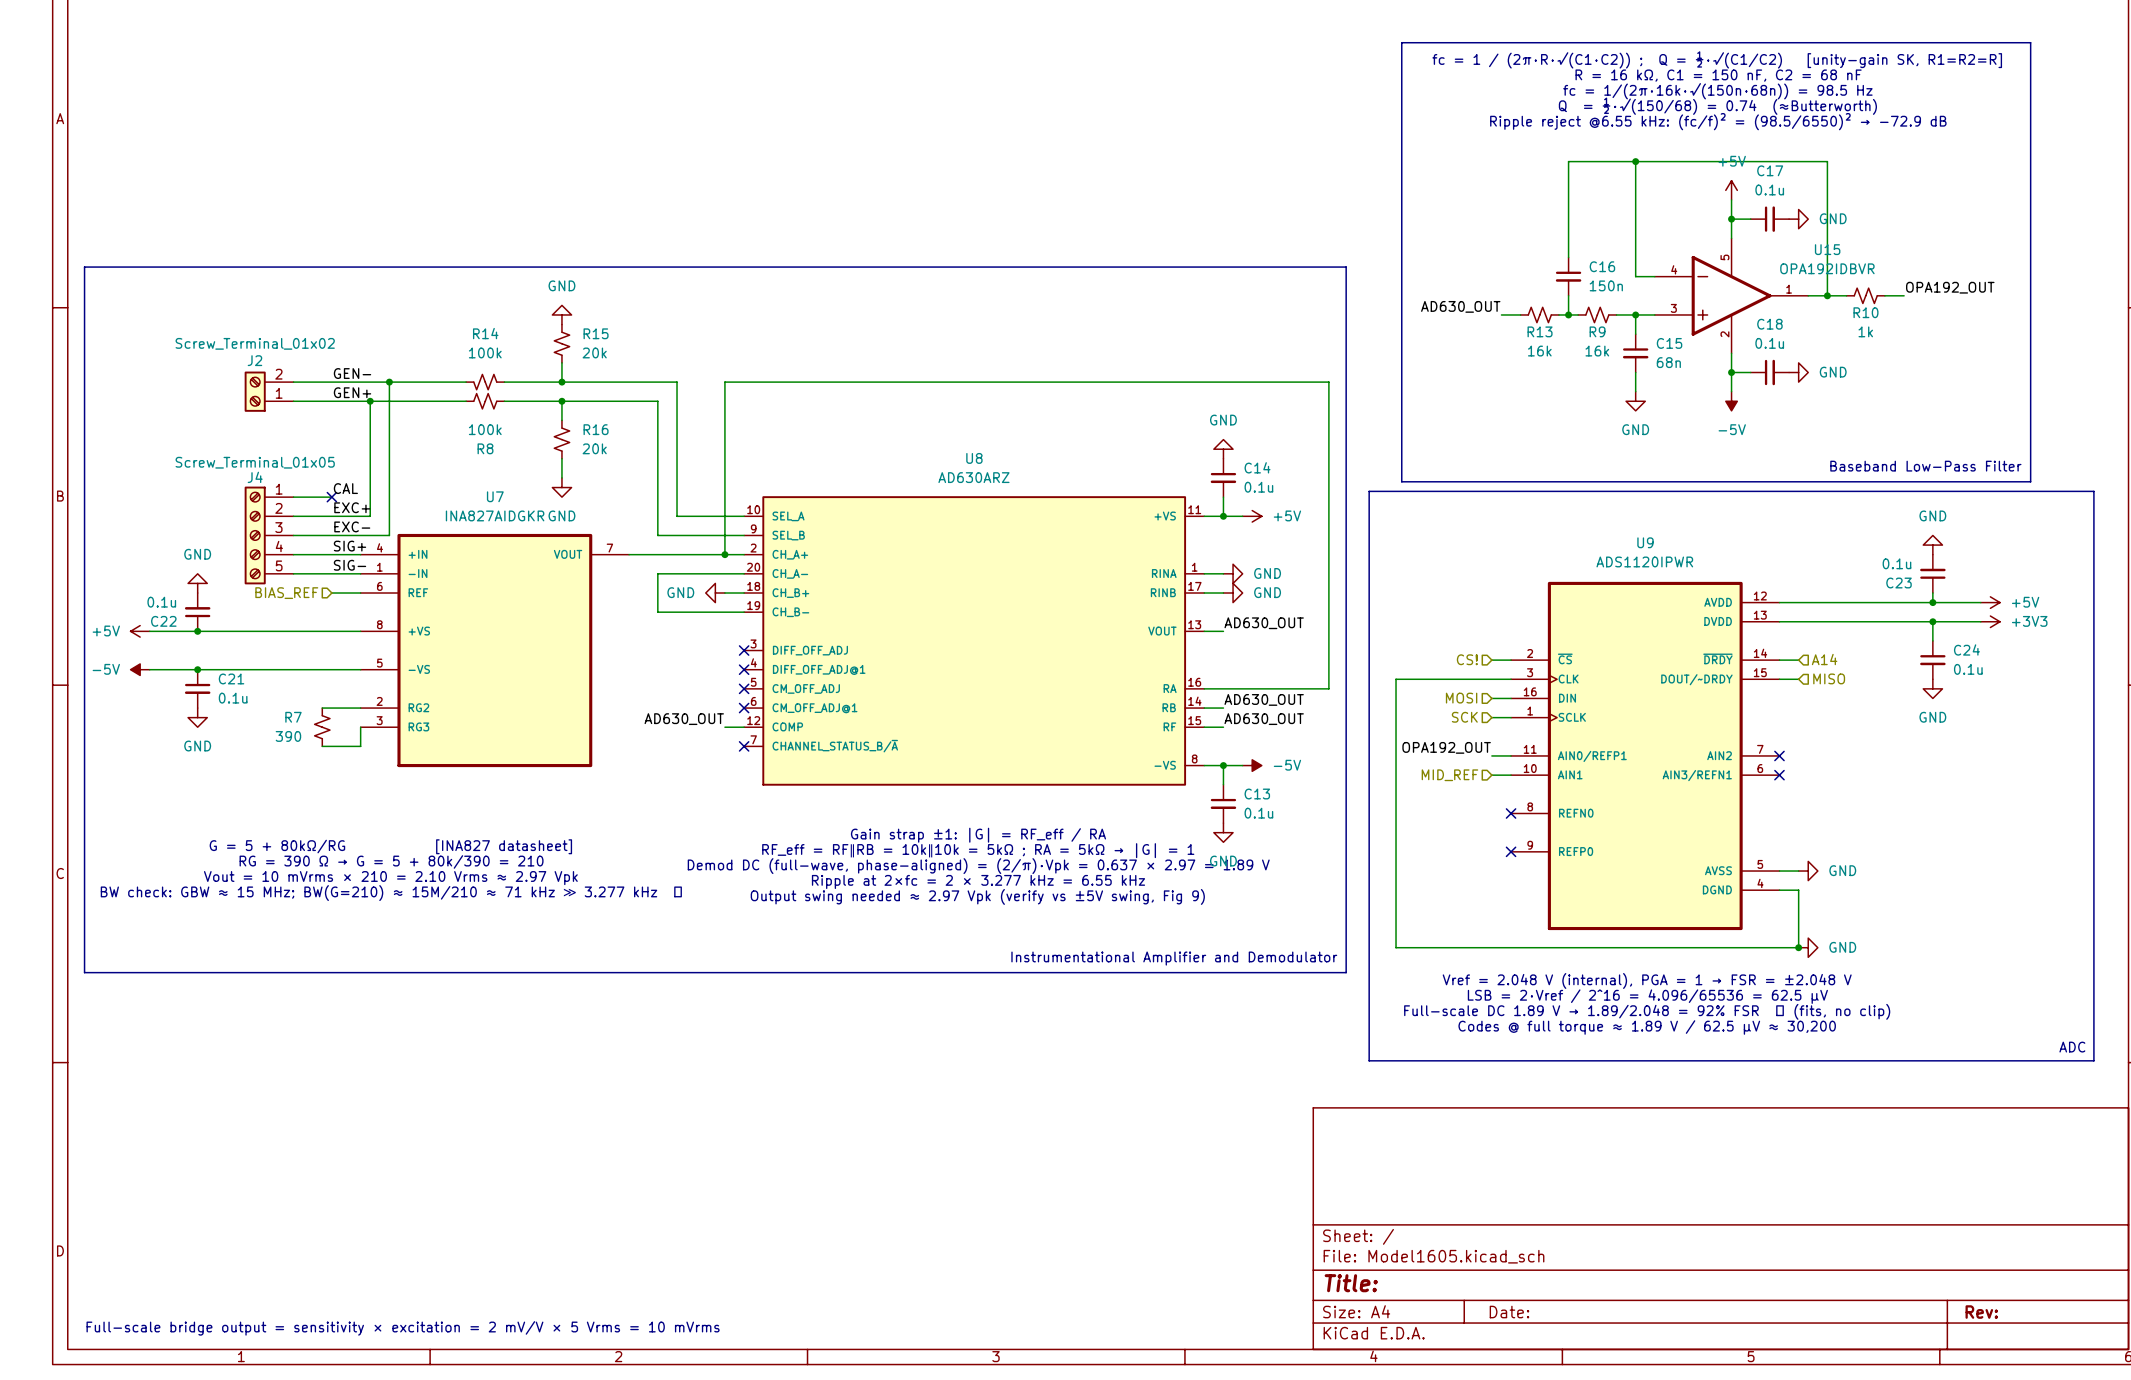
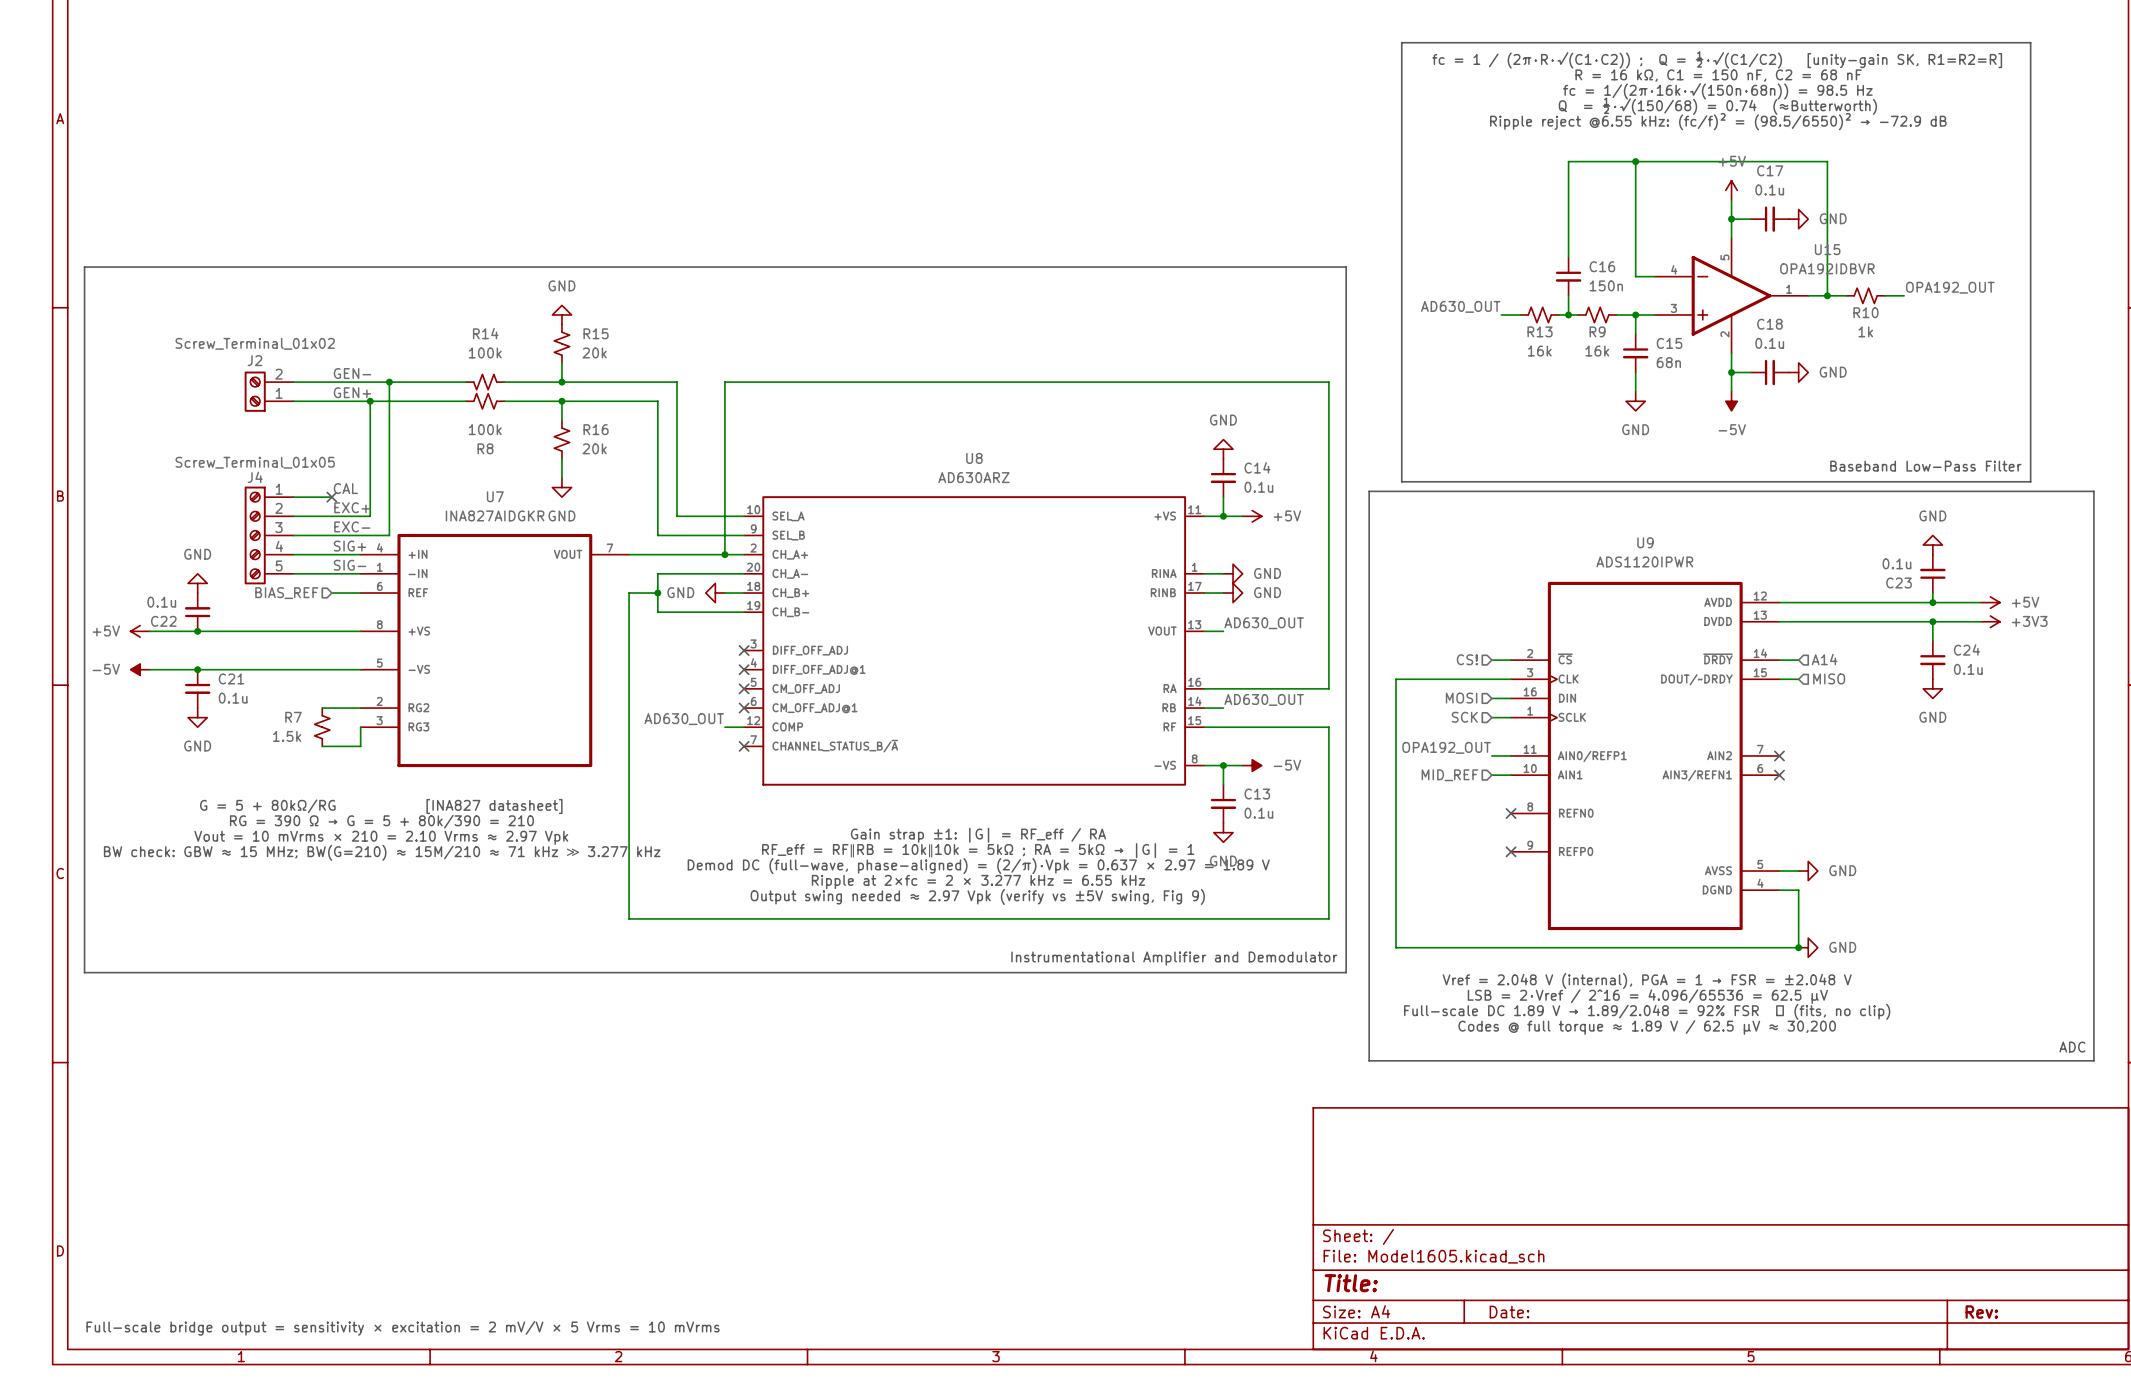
wire: none -> (657, 593) (629, 593) (629, 918) (1328, 918) (1328, 727) (1223, 727)
junction: none -> (657, 593)
label: AD630_OUT (1264, 719) -> none
R7 value: 390 (288, 736) -> 1.5k (287, 736)
text position: G = 5 + 80kΩ/RG [INA827 datasheet] (390, 846) -> G = 5 + 80kΩ/RG [INA827 datasheet] (381, 806)
text: none -> BW check: GBW ≈ 15 MHz; BW(G=210) ≈ 15M/210 ≈ 71 kHz ≫ 3.277 kHz (382, 852)
text position: RG = 390 Ω → G = 5 + 80k/390 = 210 (391, 861) -> RG = 390 Ω → G = 5 + 80k/390 = 210 (381, 821)
text position: Vout = 10 mVrms × 210 = 2.10 Vrms ≈ 2.97 Vpk (390, 878) -> Vout = 10 mVrms × 210 = 2.10 Vrms ≈ 2.97 Vpk (381, 837)
text: BW check: GBW ≈ 15 MHz; BW(G=210) ≈ 15M/210 ≈ 71 kHz ≫ 3.277 kHz ✓ (391, 893) -> none

